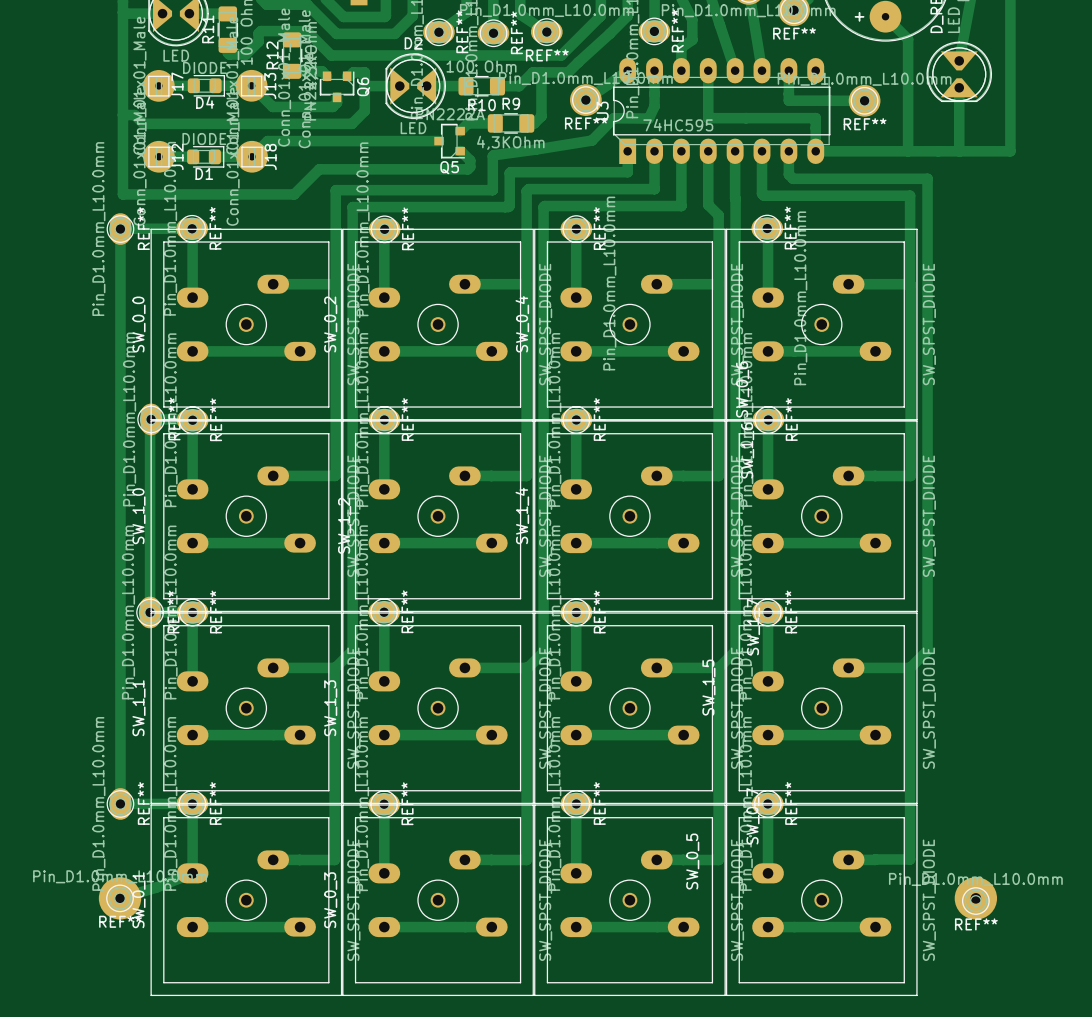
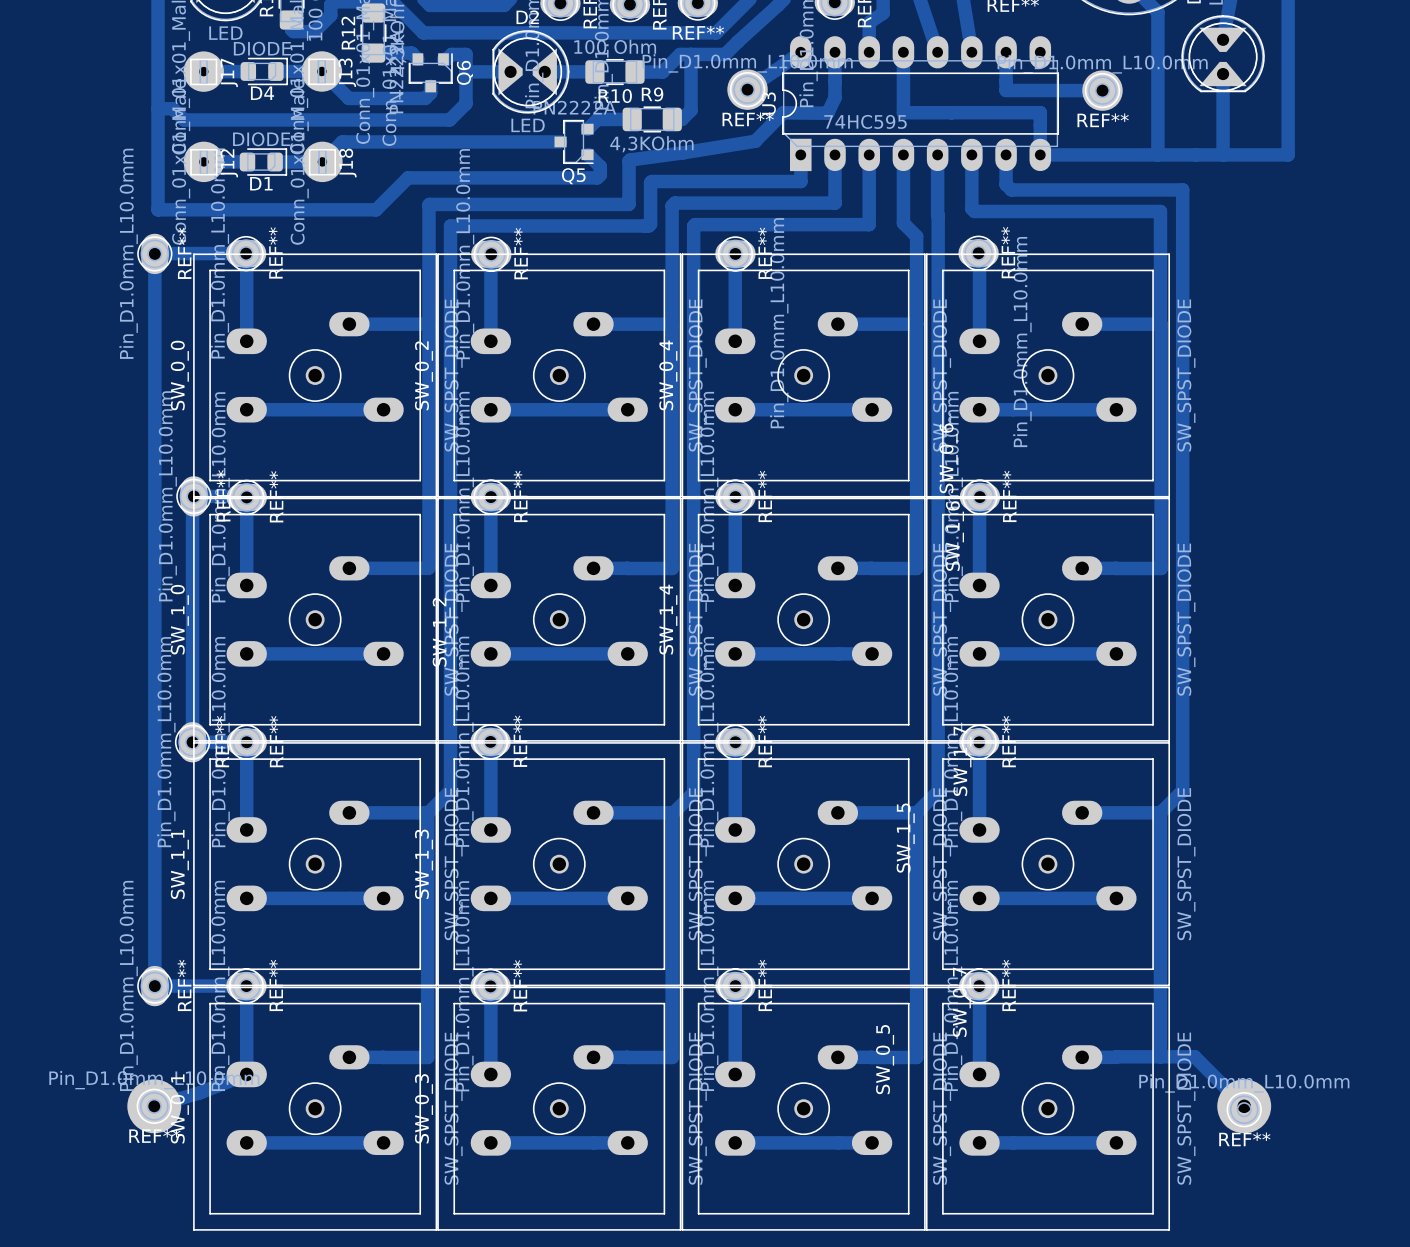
track: none -> (1160, 1056) (1194, 1056) (1244, 1106)

